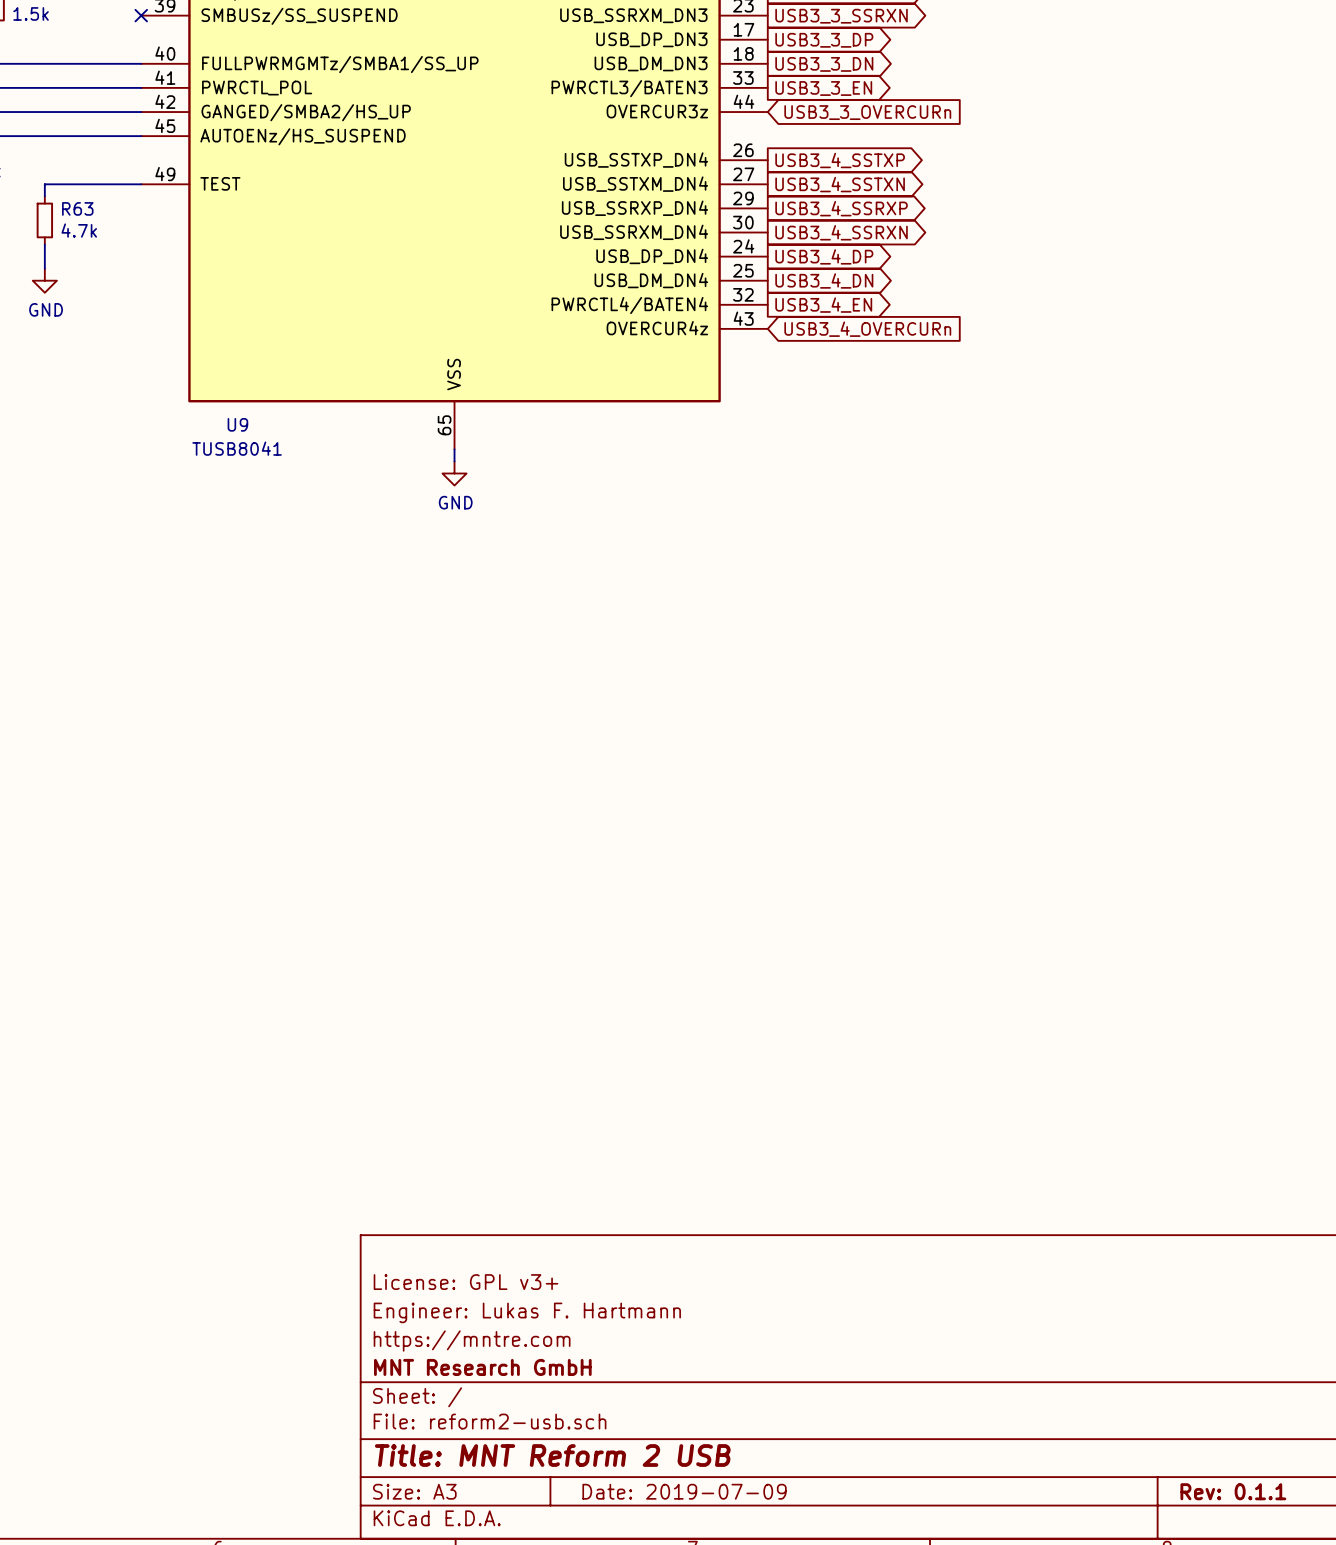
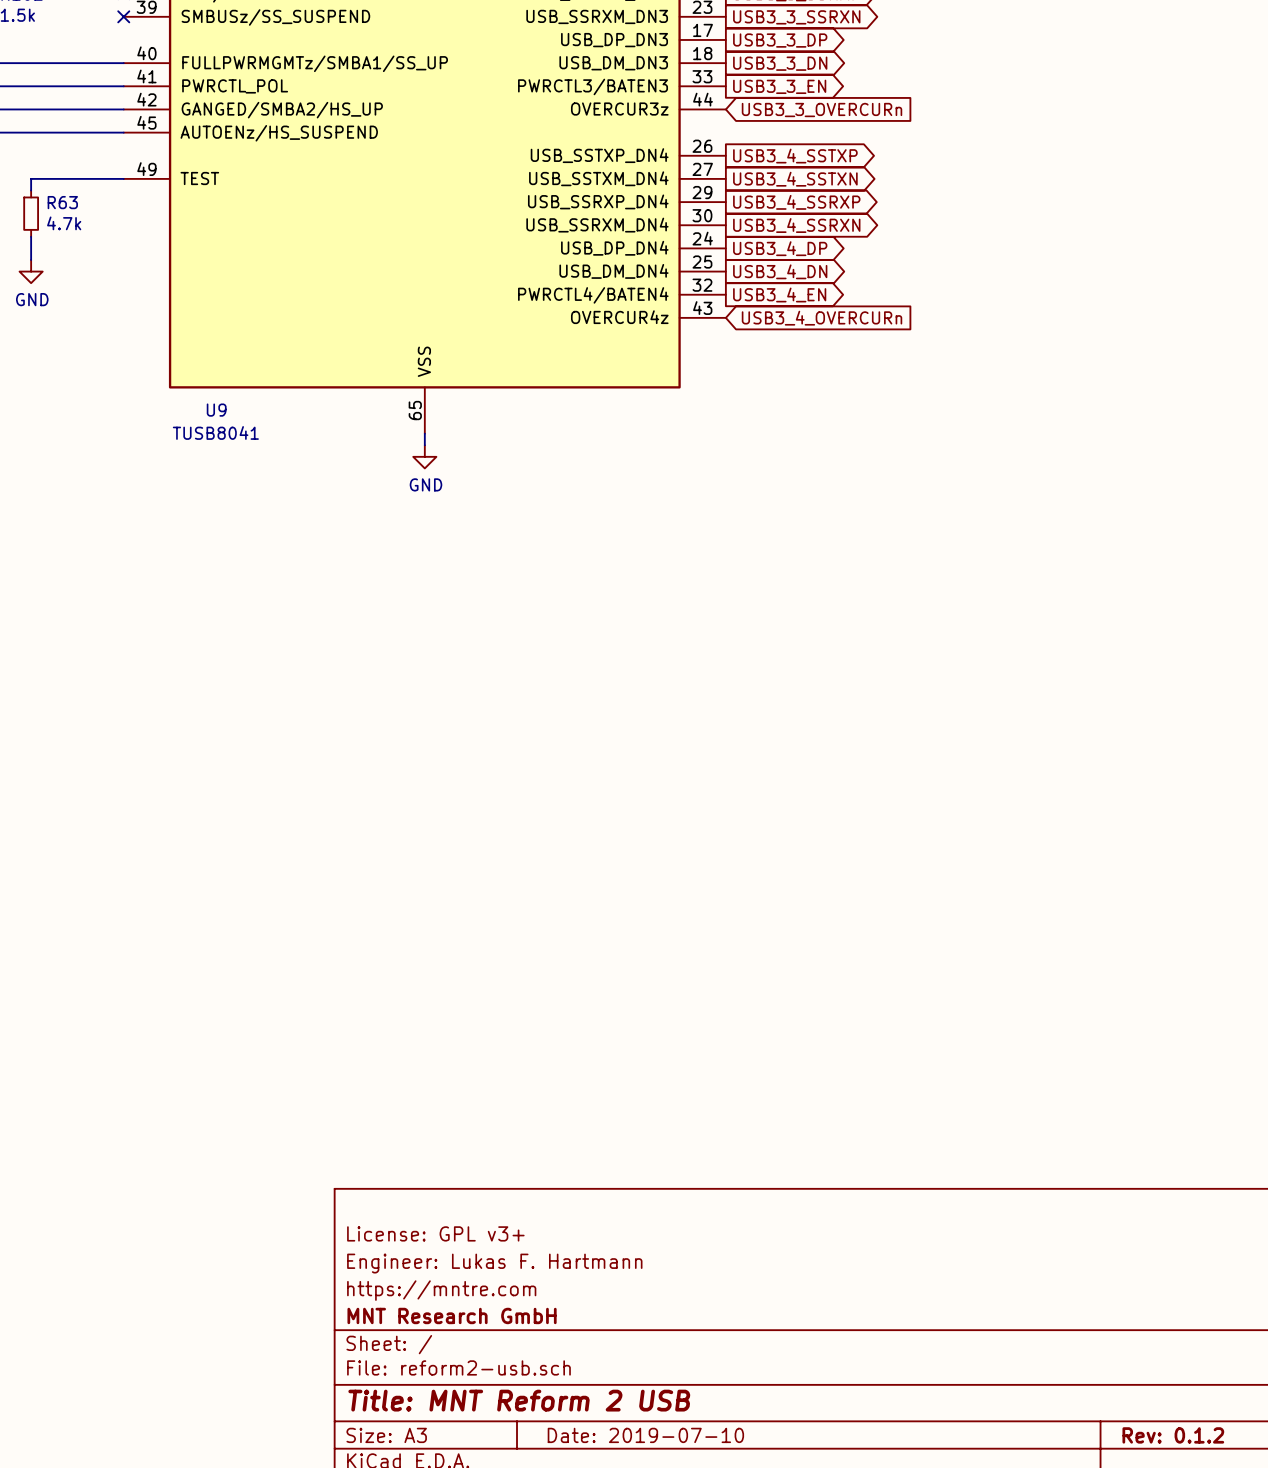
title block: Date: 2019-07-09 (684, 1491) -> Date: 2019-07-10 (645, 1435)
title block: Rev: 0.1.1 (1233, 1491) -> Rev: 0.1.2 (1173, 1435)

